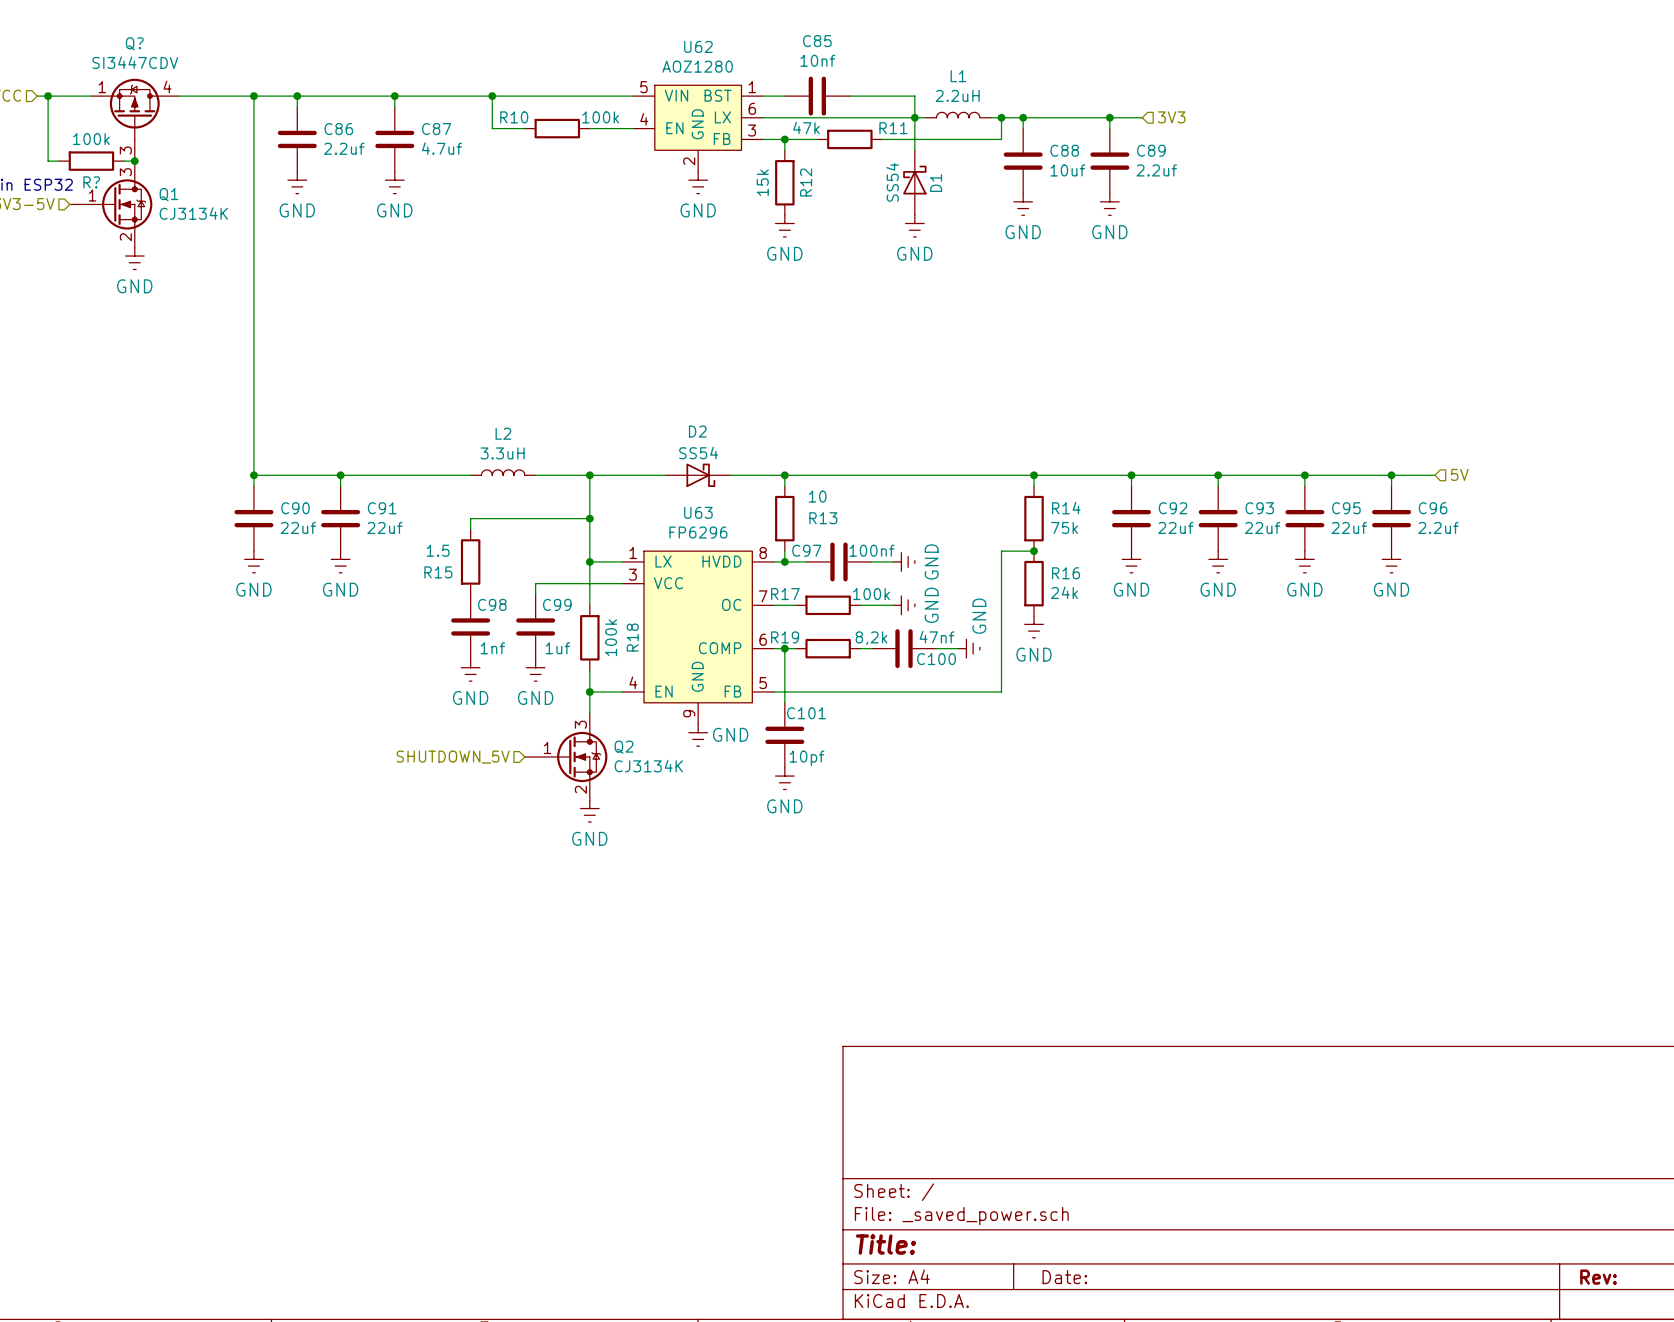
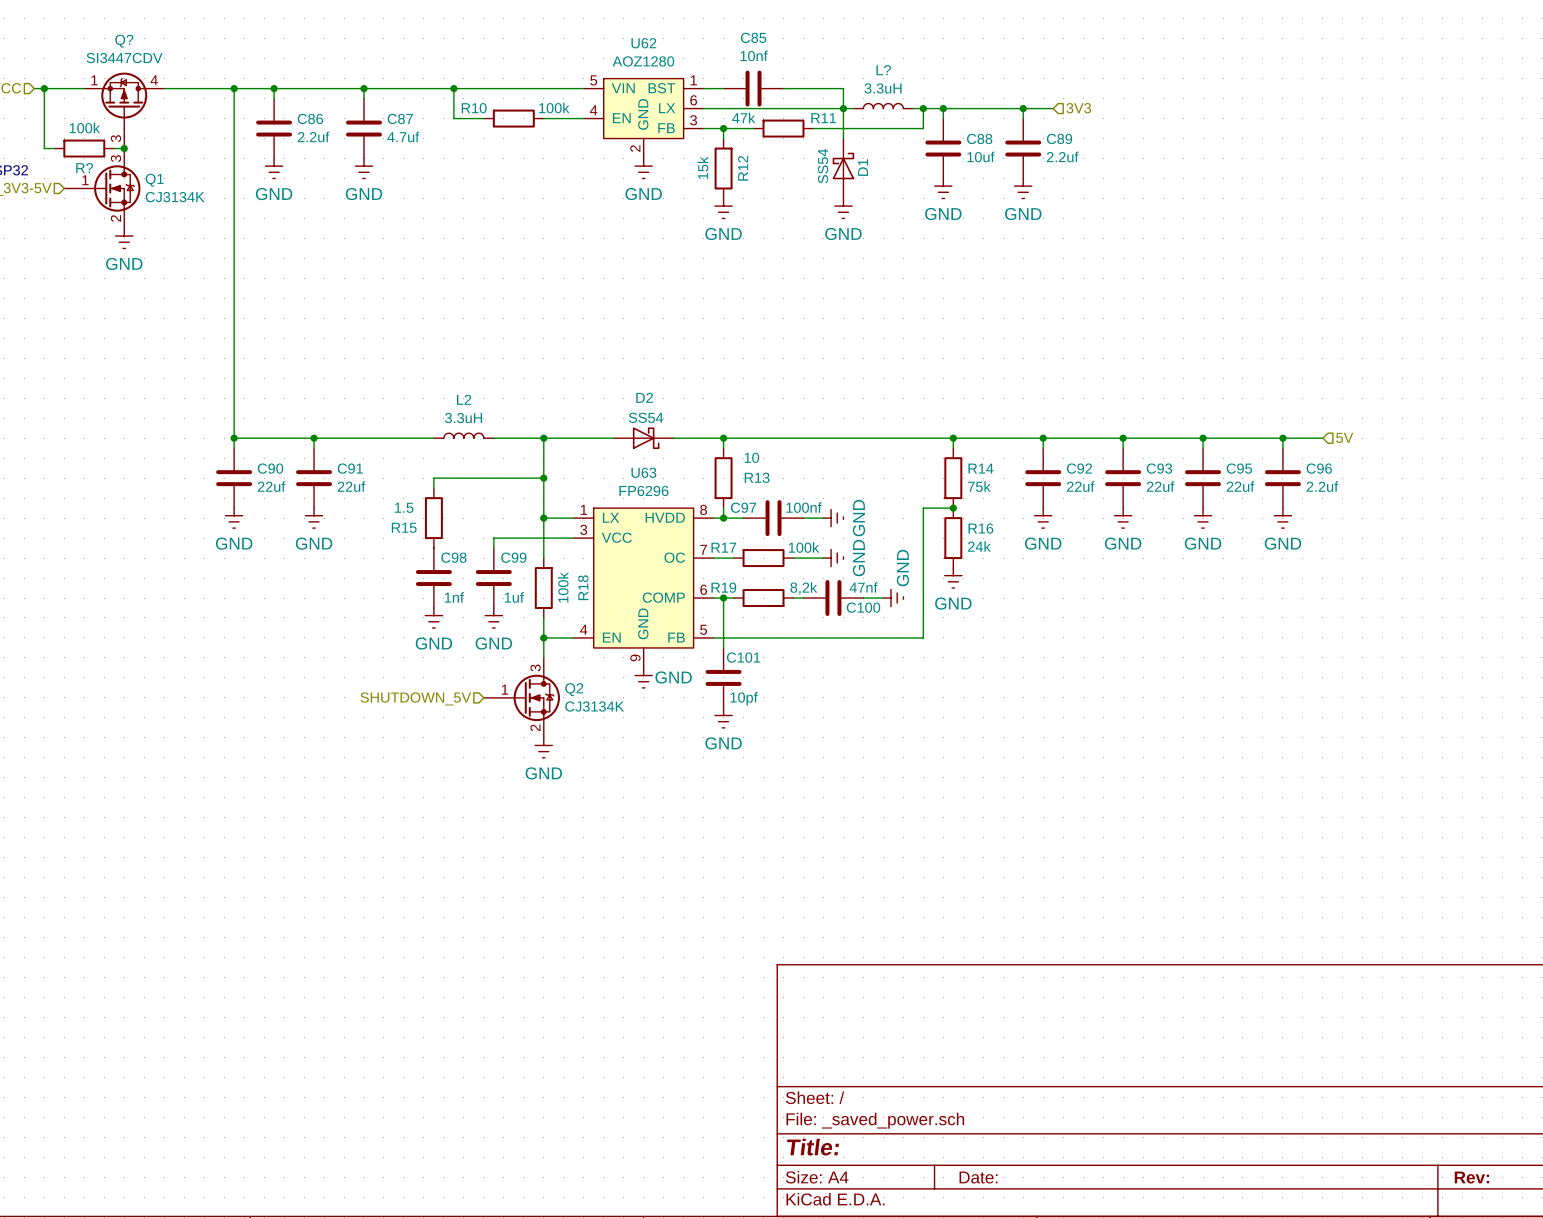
L1 name: L1 (958, 76) -> L? (883, 70)
L1 value: 2.2uH (957, 95) -> 3.3uH (883, 88)

